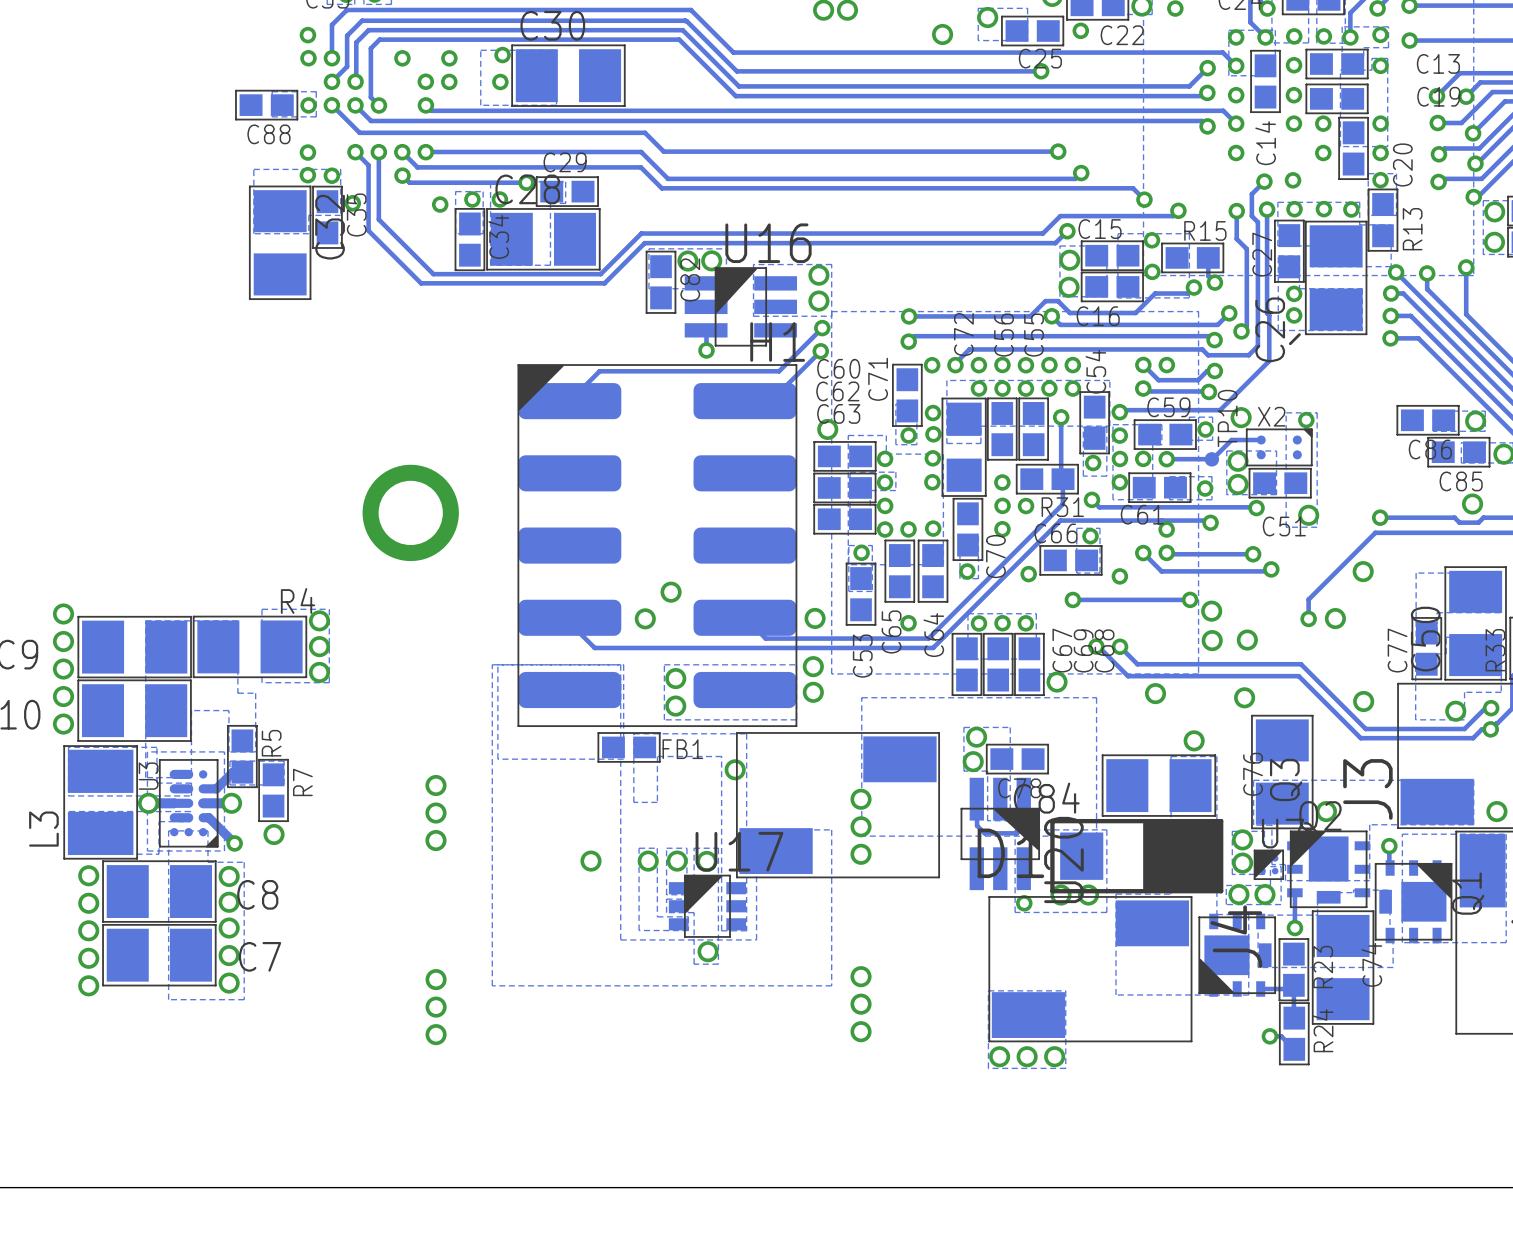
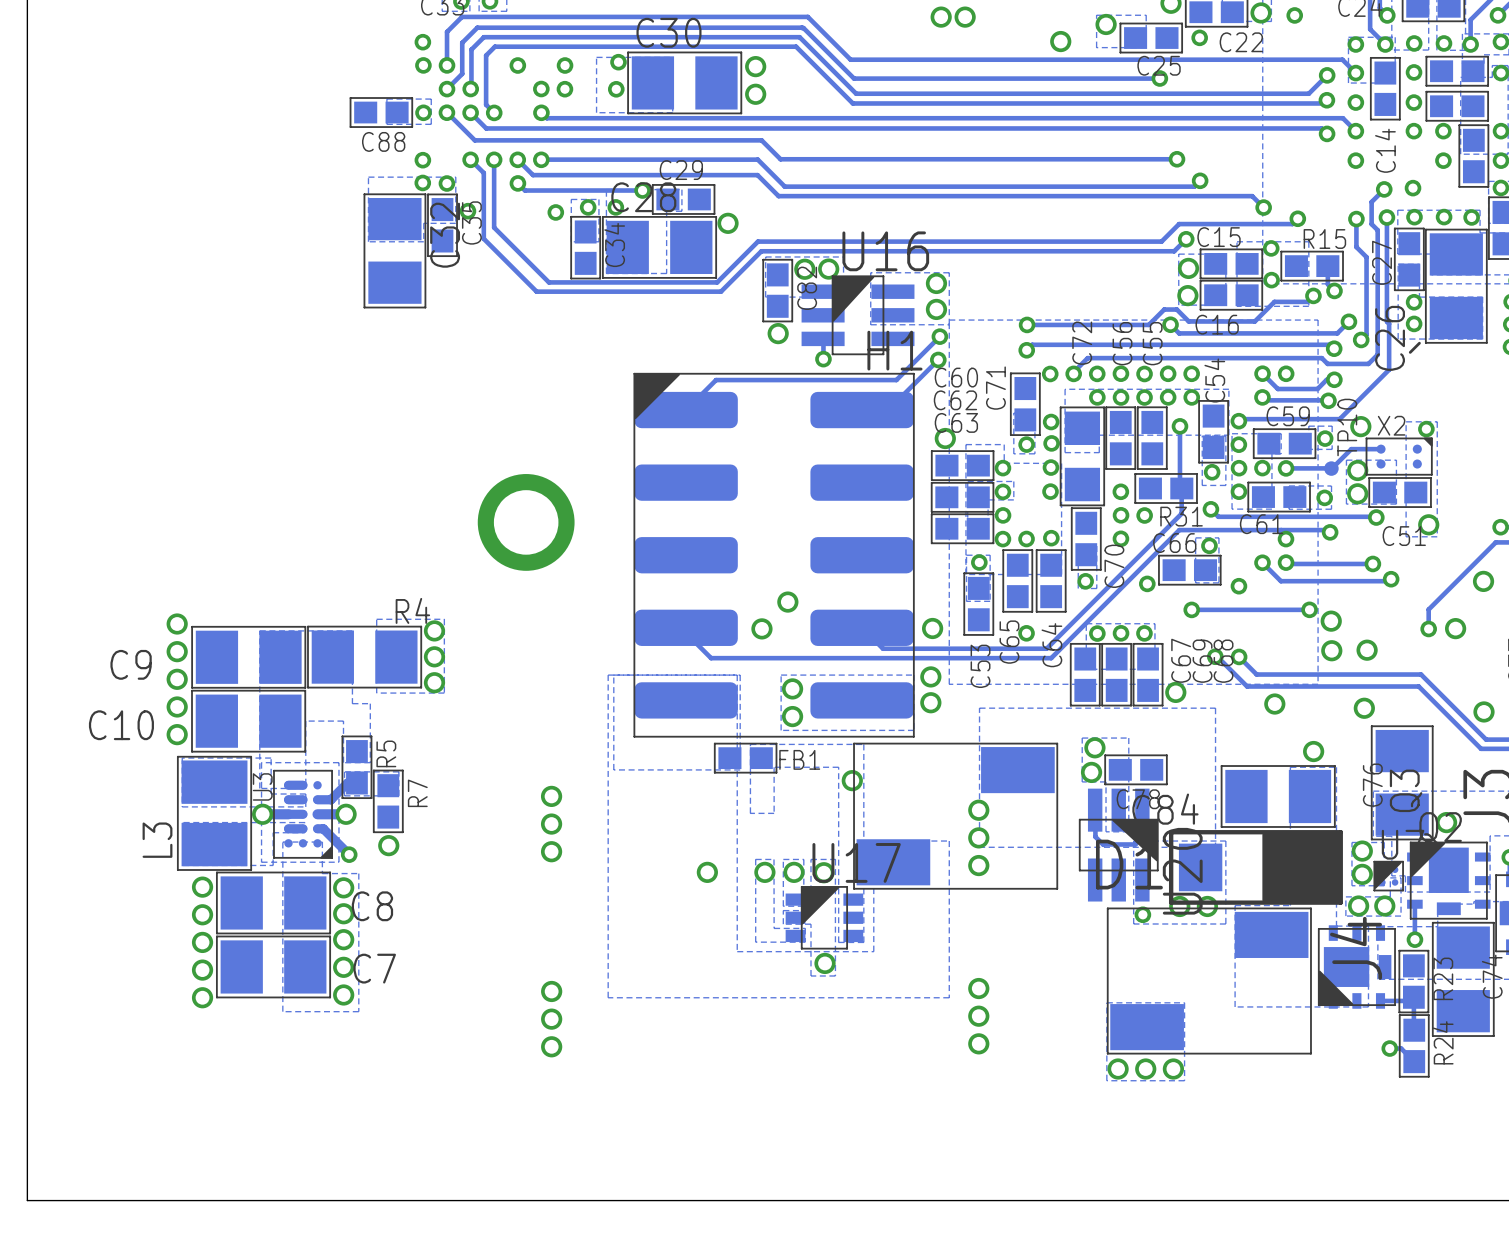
via: none -> (755, 66)
via: none -> (755, 94)
via: none -> (728, 223)
via: none -> (778, 333)

